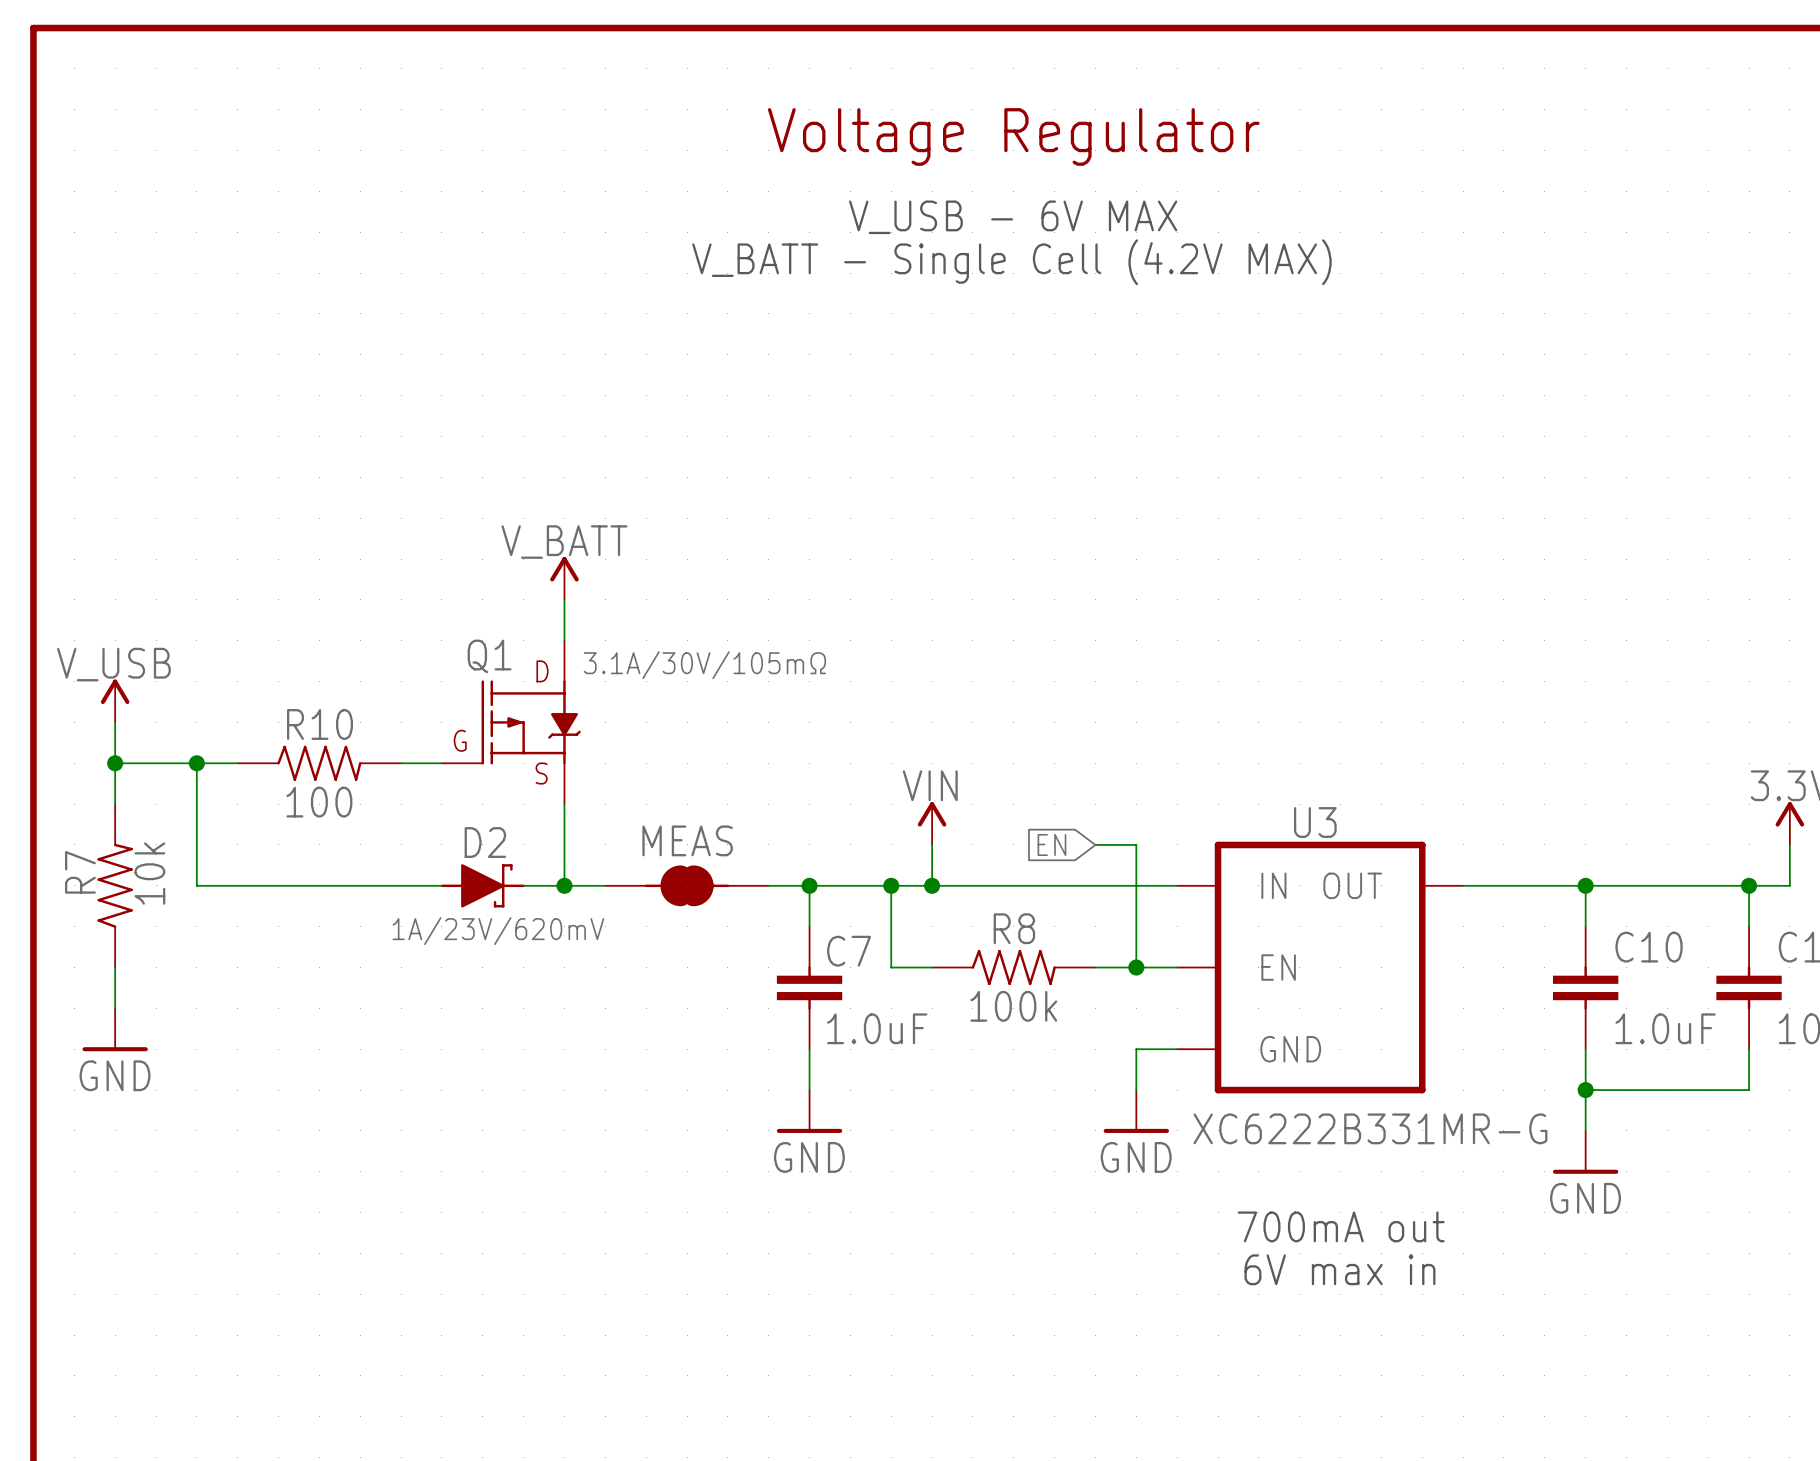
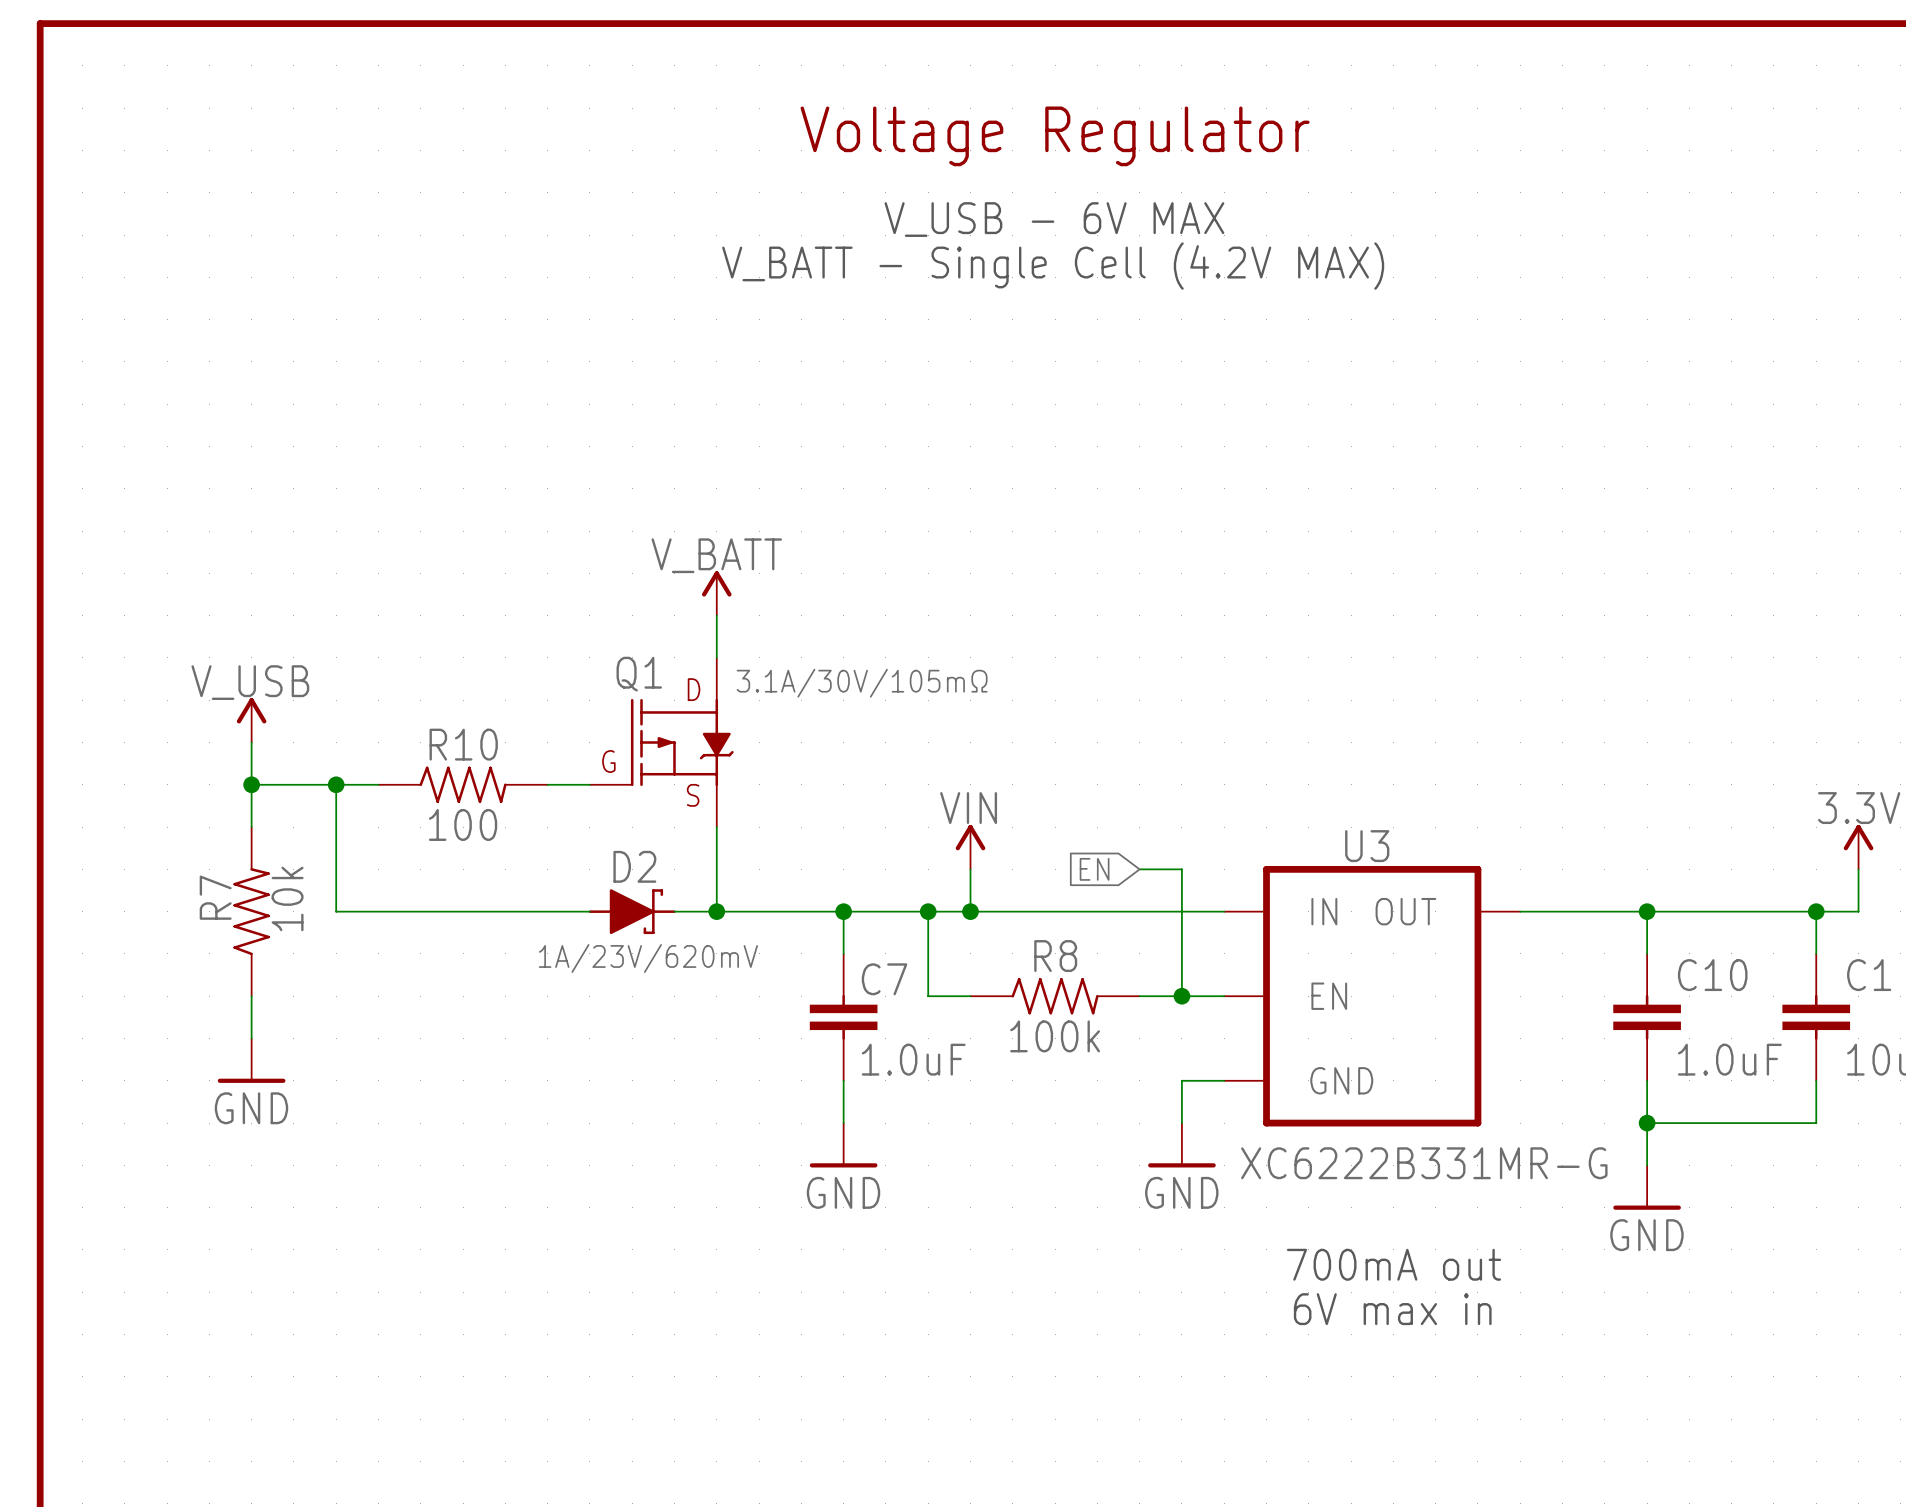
power symbol position: V_BATT (564, 578) -> V_BATT (716, 593)
wire: (564, 599) (564, 640) -> (716, 615) (716, 657)
power symbol position: V_USB (115, 700) -> V_USB (251, 720)
wire: (115, 722) (115, 804) -> (251, 742) (251, 827)
Q1 position: (511, 722) -> (661, 742)
wire: (115, 763) (237, 763) -> (378, 784) (251, 784)
junction: (115, 763) -> none
wire: (196, 763) (196, 885) (319, 885) -> (336, 784) (336, 911)
junction position: (196, 763) -> (251, 784)
R10 position: (319, 763) -> (463, 784)
junction: none -> (336, 784)
wire: (401, 763) (441, 763) -> (547, 784) (589, 784)
wire: (564, 804) (564, 885) (605, 885) -> none
wire: none -> (716, 827) (716, 911)
R7 position: (115, 885) -> (251, 911)
D2 position: (482, 885) -> (632, 911)
junction: (564, 885) -> none
MEAS: (687, 885) -> none
junction: none -> (716, 911)
wire: (115, 967) (115, 1008) -> (251, 996) (251, 1038)
power symbol position: GND (115, 1029) -> GND (251, 1060)

